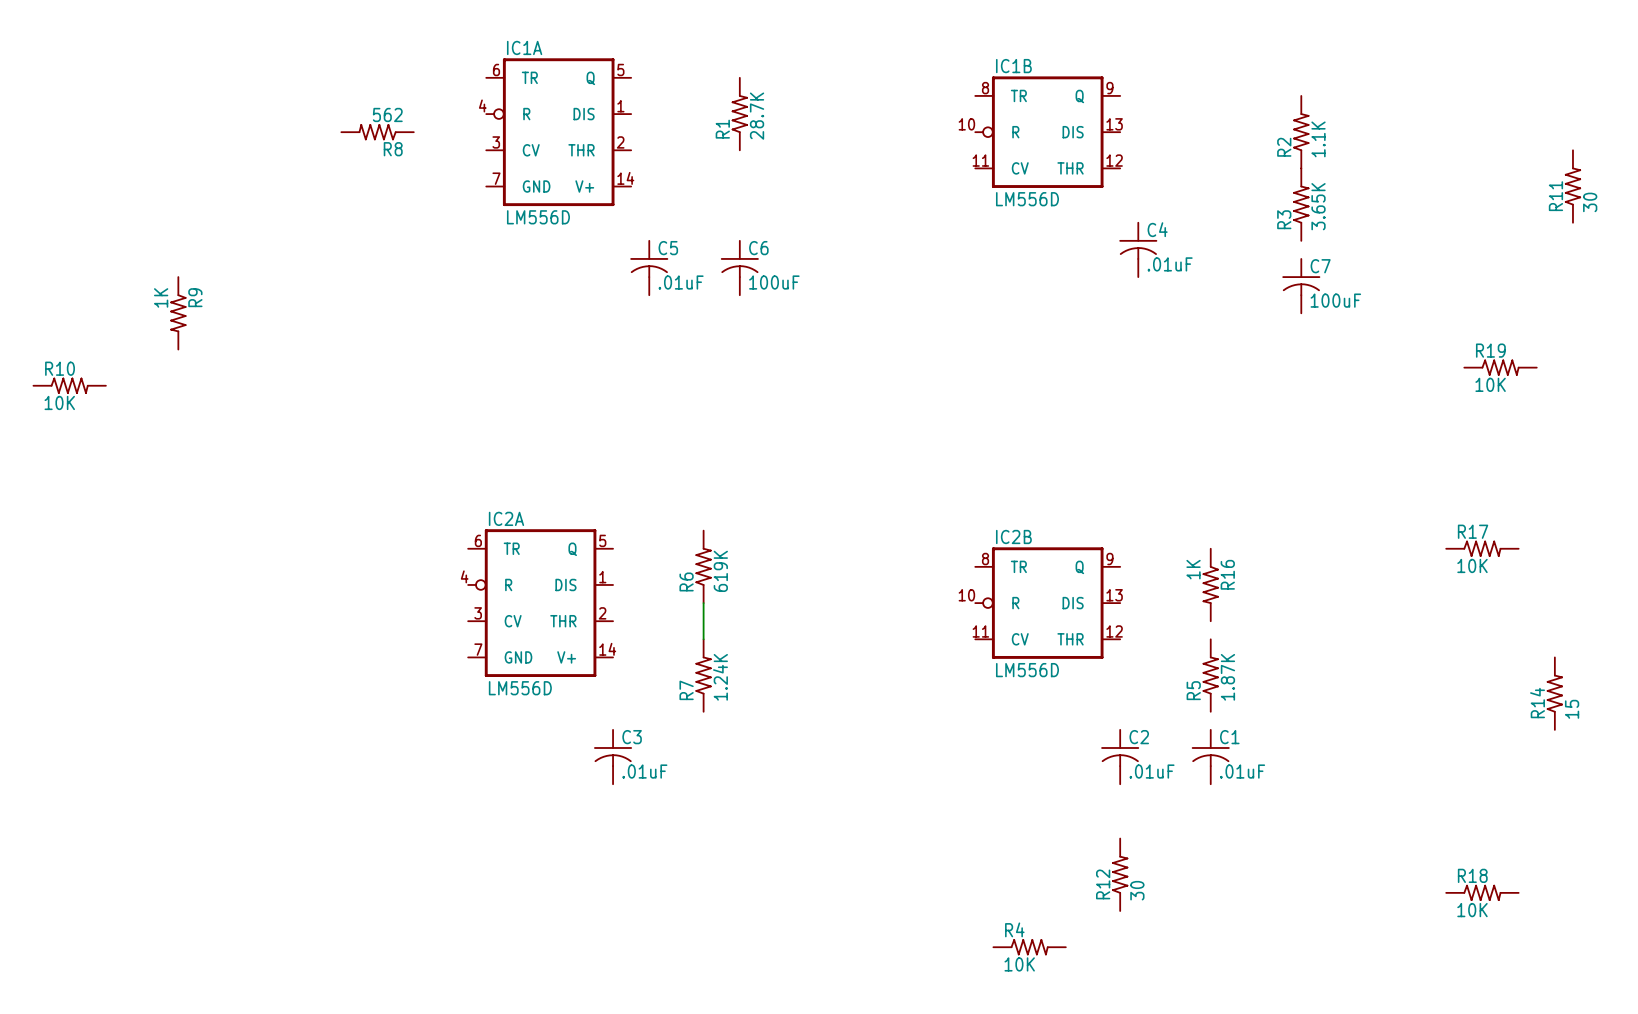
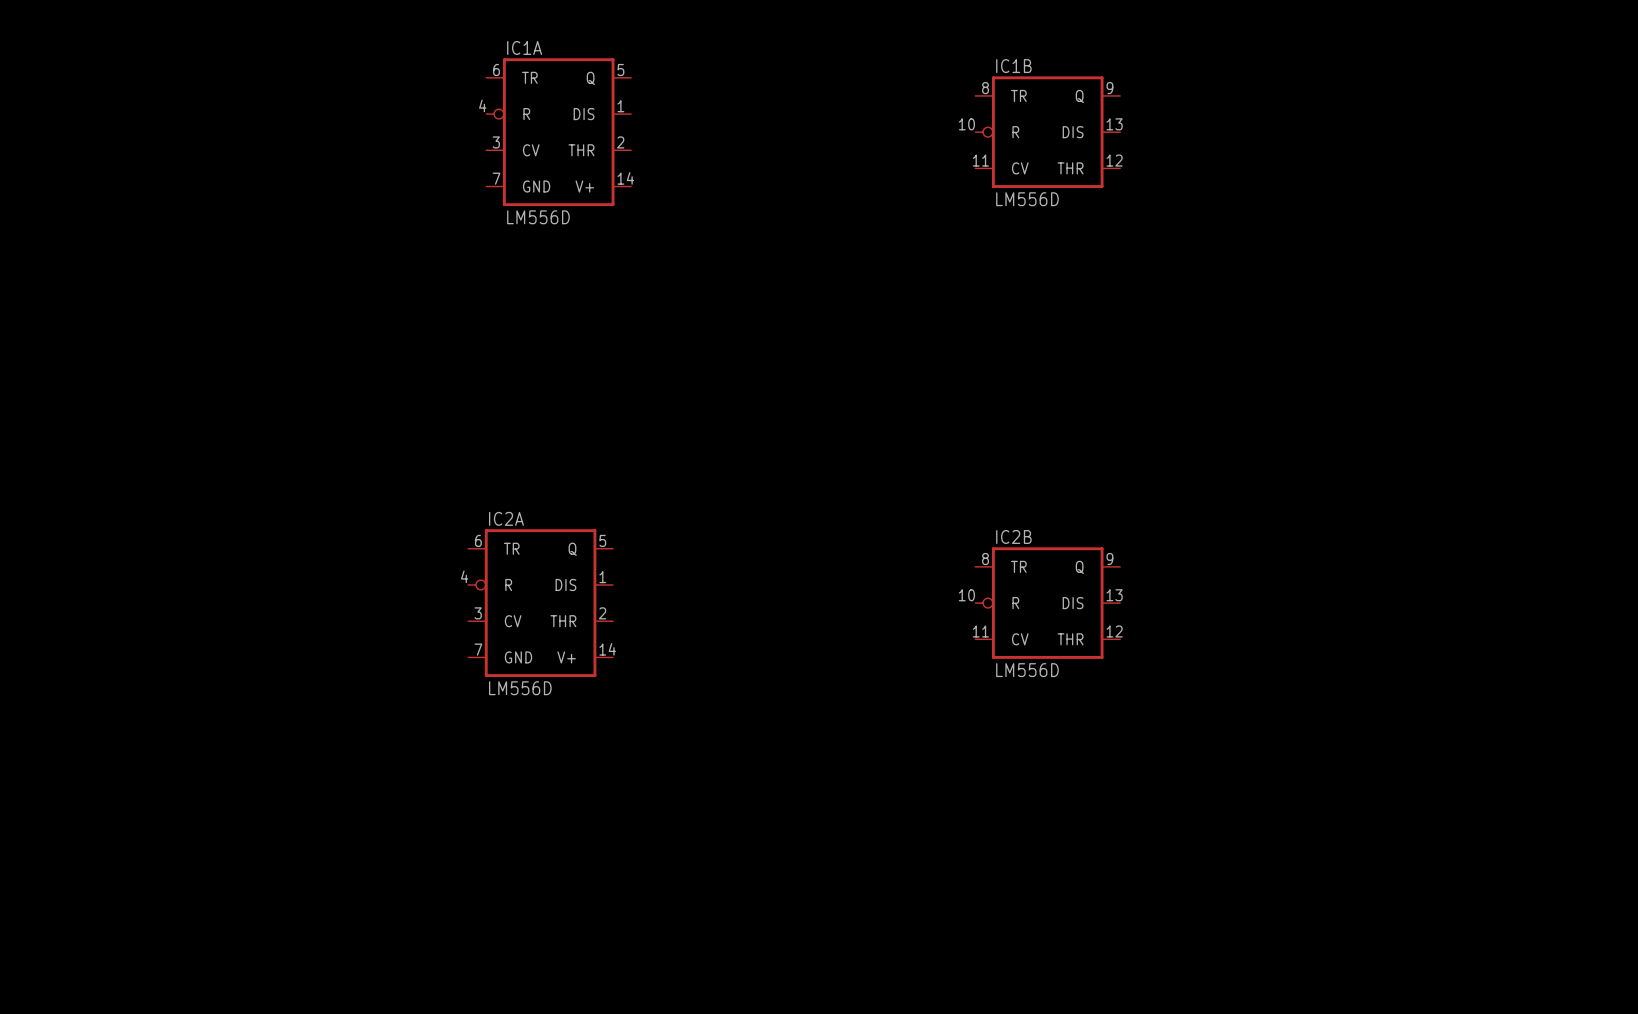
R1: 28.7K (739, 114) -> none
R8: 562 (377, 132) -> none
R2: 1.1K (1301, 132) -> none
R11: 30 (1572, 186) -> none
R3: 3.65K (1301, 204) -> none
C4: .01uF (1138, 249) -> none
C5: .01uF (649, 268) -> none
C6: 100uF (739, 268) -> none
C7: 100uF (1301, 286) -> none
R9: 1K (178, 313) -> none
R19: 10K (1500, 367) -> none
R10: 10K (69, 385) -> none
R17: 10K (1482, 548) -> none
R6: 619K (703, 566) -> none
R16: 1K (1210, 584) -> none
wire: (703, 603) (703, 639) -> none
R7: 1.24K (703, 675) -> none
R5: 1.87K (1210, 675) -> none
R14: 15 (1554, 693) -> none
C3: .01uF (613, 757) -> none
C2: .01uF (1120, 757) -> none
C1: .01uF (1210, 757) -> none
R12: 30 (1120, 874) -> none
R18: 10K (1482, 892) -> none
R4: 10K (1029, 947) -> none

